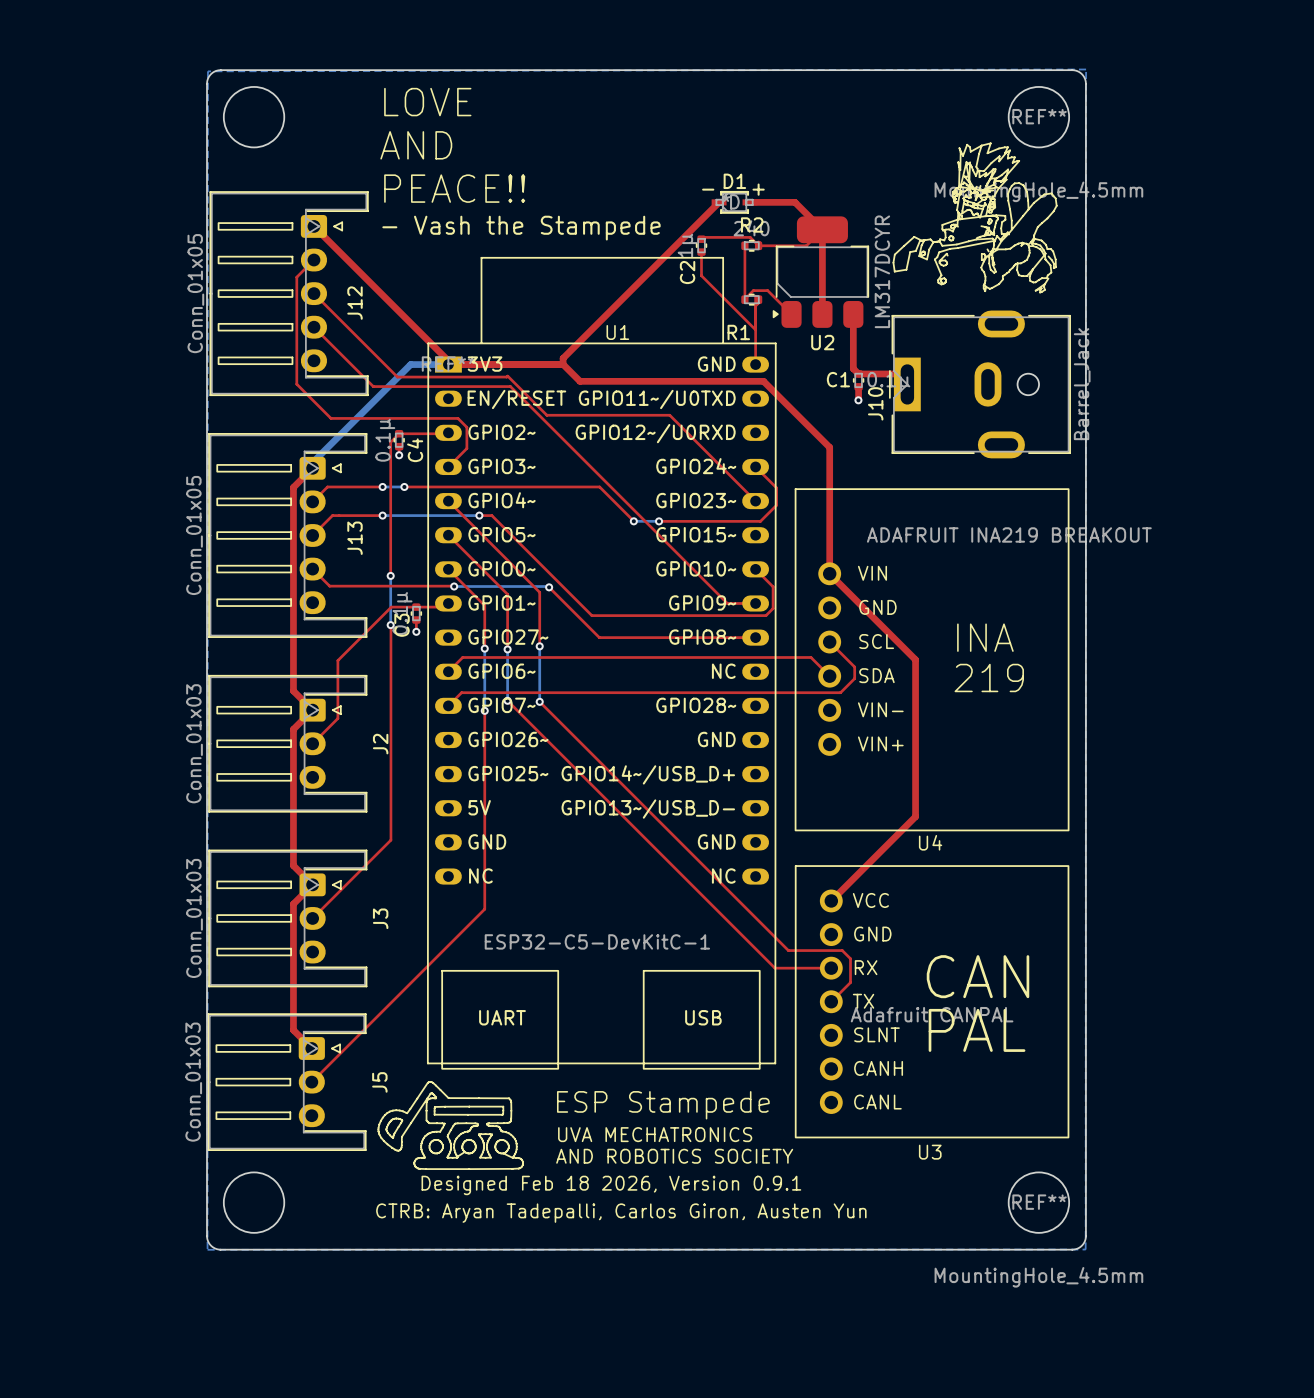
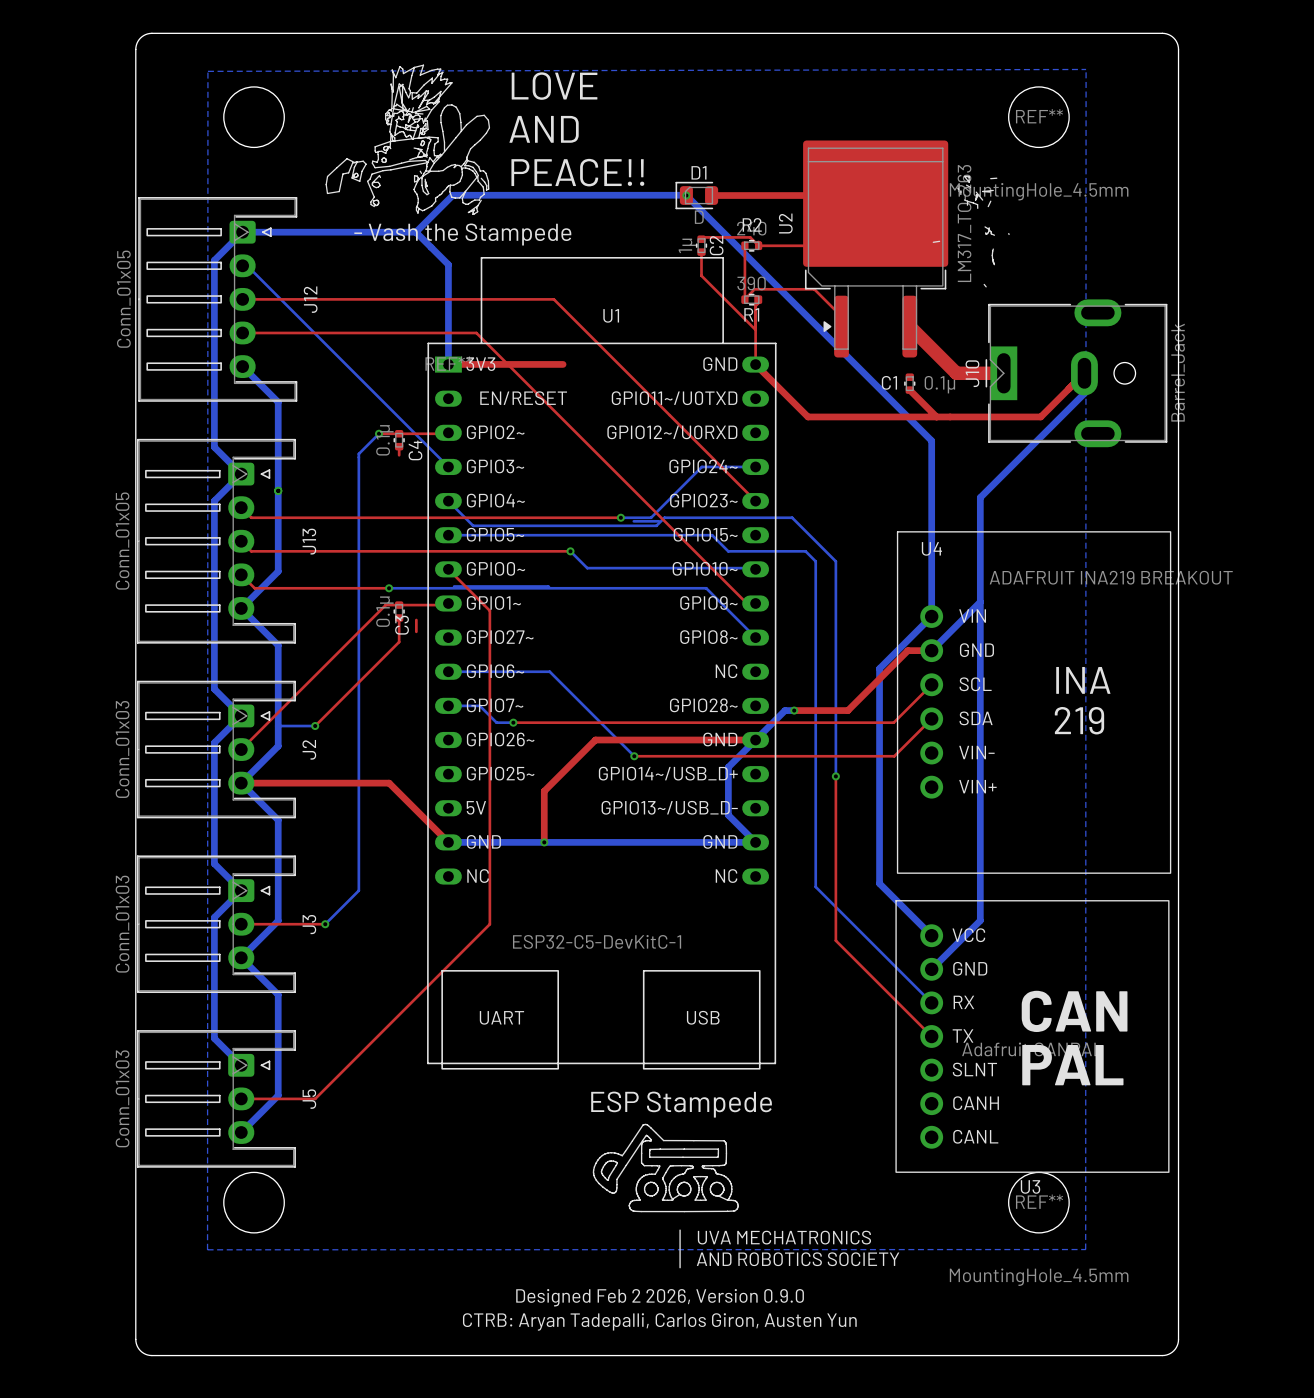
line: none -> (414, 67) (423, 65) (420, 75) (440, 69) (437, 75) (442, 72) (440, 80) (447, 79) (445, 84) (452, 82) (433, 103)
line: none -> (414, 67) (403, 73) (399, 66) (395, 77) (392, 70) (393, 92) (391, 84) (390, 110)
line: none -> (414, 67) (408, 97) (403, 87) (399, 84) (393, 108) (412, 111) (413, 107)
board edge: (220, 70) (1072, 70) (1083, 75) (1085, 83) (1085, 1236) (1080, 1246) (1072, 1249) (220, 1249) (209, 1244) (207, 1236) (207, 83) (211, 74) (220, 70) -> (151, 33) (140, 38) (135, 49) (135, 1339) (139, 1349) (145, 1354) (151, 1355) (1162, 1355) (1172, 1352) (1176, 1347) (1178, 1339) (1178, 49) (1175, 39) (1168, 34) (1162, 33) (151, 33)
line: none -> (439, 74) (431, 83) (432, 78) (416, 93) (412, 92) (412, 99) (419, 94) (418, 98) (426, 91)
line: none -> (426, 91) (423, 98) (418, 107) (428, 93) (428, 90) (426, 91)
line: none -> (429, 100) (426, 104) (433, 103)
line: none -> (429, 100) (423, 100)
line: none -> (429, 100) (440, 91) (438, 100) (433, 103)
text position: LOVE (427, 102) -> LOVE (554, 86)
line: none -> (433, 103) (439, 101) (425, 120) (427, 121) (427, 129) (423, 134) (421, 133) (424, 128) (422, 128) (422, 128) (422, 127) (424, 126) (424, 125) (425, 123) (426, 128) (425, 128) (420, 128) (418, 138)
line: none -> (409, 108) (407, 111)
line: none -> (390, 110) (385, 114) (386, 123) (390, 124)
line: none -> (390, 110) (391, 111)
line: none -> (407, 111) (405, 115) (420, 116) (418, 120) (415, 121)
line: none -> (407, 111) (402, 102) (402, 84) (399, 87) (403, 109) (406, 111) (396, 104) (393, 106) (389, 131) (392, 141)
line: none -> (411, 112) (429, 109) (426, 106) (415, 111) (415, 113) (422, 113)
line: none -> (409, 114) (415, 121)
line: none -> (398, 116) (396, 120) (394, 135) (403, 131) (406, 136) (410, 135) (412, 139) (417, 124) (418, 126) (418, 127) (416, 127) (410, 126)
line: none -> (409, 116) (408, 122) (410, 118) (409, 116)
line: none -> (398, 117) (403, 119) (401, 111) (394, 113) (393, 116) (387, 115) (388, 112) (389, 112) (390, 116) (387, 123) (390, 124)
line: none -> (425, 118) (423, 123) (422, 118) (413, 119)
line: none -> (415, 121) (405, 128) (405, 124) (410, 126)
line: none -> (396, 125) (410, 130)
line: none -> (410, 126) (410, 130)
line: none -> (410, 130) (415, 130)
line: none -> (461, 131) (459, 113) (456, 107) (447, 105) (440, 115) (444, 151)
line: none -> (425, 137) (430, 139) (426, 152)
line: none -> (394, 140) (391, 134) (390, 147)
line: none -> (422, 140) (421, 141) (421, 145) (424, 143) (422, 140)
text position: AND (416, 145) -> AND (544, 129)
line: (981, 145) (990, 143) (987, 153) (1007, 147) (1004, 153) (1010, 150) (1007, 158) (1014, 157) (1012, 162) (1019, 160) (1000, 181) -> none
line: (981, 145) (970, 151) (967, 144) (963, 155) (959, 148) (959, 186) (952, 192) (954, 201) (957, 202) -> none
line: (981, 145) (975, 175) (970, 165) (966, 162) (960, 186) (979, 190) (980, 185) -> none
line: none -> (387, 146) (384, 147) (383, 149) (386, 150) (389, 147) (390, 148)
line: none -> (387, 146) (385, 153) (381, 151) (377, 152)
line: none -> (414, 148) (421, 149) (417, 157) (426, 153) (427, 155) (409, 159)
line: none -> (417, 148) (427, 157)
line: none -> (377, 152) (377, 162) (372, 161) (372, 163) (375, 167) (409, 161) (425, 160) (427, 162) (371, 174) (367, 181) (374, 197) (371, 204) (374, 206)
line: none -> (377, 152) (375, 150) (375, 146) (390, 141) (429, 137) (438, 137) (438, 141) (434, 143) (434, 155) (441, 154)
line: (1006, 152) (999, 161) (999, 156) (984, 171) (979, 170) (979, 177) (986, 173) (985, 176) (993, 169) -> none
line: none -> (441, 155) (429, 171) (426, 170)
line: none -> (441, 155) (466, 124) (476, 116) (484, 115) (488, 120) (489, 127) (470, 148) (466, 159)
line: none -> (441, 155) (437, 155) (433, 161) (429, 157) (426, 170)
line: none -> (347, 158) (354, 162) (363, 161) (366, 164) (359, 181) (352, 178) (354, 167) (357, 161) (352, 163) (348, 172) (342, 174) (339, 191) (327, 193) (327, 176) (347, 158)
line: none -> (383, 158) (382, 161) (385, 161) (385, 158) (383, 158)
line: none -> (466, 159) (460, 166) (456, 165) (454, 167) (455, 164) (443, 170) (430, 171) (419, 178) (414, 189) (418, 198) (416, 207) (417, 213) (418, 208)
line: none -> (467, 160) (464, 165) (473, 167) (478, 175) (465, 191)
line: none -> (467, 160) (474, 162) (480, 171) (485, 173) (488, 189) (486, 190) (486, 185) (481, 178)
line: (993, 169) (991, 176) (986, 186) (995, 171) (995, 169) (993, 169) -> none
line: none -> (426, 170) (421, 178) (421, 185) (423, 191) (427, 194) (428, 193) (425, 186) (425, 179)
line: none -> (420, 171) (421, 173)
line: none -> (357, 175) (355, 173) (353, 176) (357, 176)
line: none -> (414, 175) (414, 181) (417, 181) (418, 177) (414, 175)
line: none -> (380, 177) (379, 175) (372, 183)
line: none -> (425, 181) (426, 184) (427, 186) (425, 181)
line: (1000, 181) (1006, 178) (1008, 169) (993, 182) (1000, 181) -> none
line: (1000, 181) (1006, 179) (992, 199) (994, 199) (995, 207) (991, 212) (988, 211) (991, 207) (989, 206) (989, 206) (990, 206) (991, 204) (992, 203) (993, 201) (993, 206) (992, 206) (988, 206) (985, 216) -> none
line: none -> (374, 182) (372, 184) (374, 186) (379, 185) (378, 182) (374, 182)
line: none -> (450, 185) (459, 181) (462, 174) (461, 168) (469, 169) (477, 177) (478, 181) (483, 187) (484, 194) (479, 200) (466, 204) (462, 202) (462, 198) (465, 191)
line: none -> (450, 185) (451, 197) (459, 197) (465, 191)
line: none -> (450, 185) (435, 198) (435, 201) (431, 205) (422, 210) (418, 208)
line: (976, 186) (974, 189) -> none
text position: PEACE!! (454, 188) -> PEACE!! (577, 172)
text: - (708, 189) -> none
line: (974, 189) (969, 180) (970, 162) (966, 165) (970, 187) (974, 189) (963, 182) (961, 184) (957, 209) (959, 219) -> none
line: (974, 189) (973, 193) (987, 194) (984, 199) (982, 200) (972, 206) (973, 202) (977, 204) (981, 205) (984, 205) (985, 205) (985, 204) (984, 203) (980, 217) (977, 213) (973, 214) (970, 209) (962, 213) (963, 198) (966, 194) -> none
D1 footprint: [711, 190, 758, 214] -> [675, 181, 719, 210]
line: (979, 190) (997, 187) (993, 184) (982, 190) (982, 191) -> none
via: none -> (686, 195)
top track: none -> (711, 195) (873, 195)
line: (966, 196) (970, 197) (969, 189) (961, 191) (960, 194) (954, 193) (955, 191) (956, 191) (957, 194) (954, 201) (958, 202) -> none
line: (992, 196) (990, 201) (989, 196) (980, 197) -> none
line: none -> (481, 200) (477, 205)
top track: (719, 202) (563, 358) (563, 364) (580, 381) (763, 381) (829, 447) (829, 573) (915, 659) (915, 816) (831, 900) -> none
top track: (750, 202) (795, 202) (822, 229) (822, 314) -> none
line: none -> (378, 203) (377, 200) (374, 200) (374, 205) (377, 204)
line: (963, 203) (982, 208) -> none
line: none -> (477, 205) (468, 212) (474, 210) (472, 214) (477, 211) (477, 205)
line: none -> (416, 206) (418, 208)
line: (1028, 209) (1027, 191) (1023, 185) (1014, 183) (1008, 193) (1011, 229) -> none
line: (992, 215) (998, 217) (993, 230) -> none
U2 footprint: [772, 216, 870, 328] -> [803, 140, 949, 358]
line: (962, 219) (958, 212) (957, 225) -> none
line: (990, 219) (988, 219) (988, 223) (991, 221) (990, 219) -> none
line: (955, 224) (951, 225) (950, 227) (954, 228) (956, 225) (958, 226) -> none
line: (955, 224) (953, 231) (949, 229) (945, 230) -> none
top track: (313, 226) (448, 360) (448, 364) (560, 364) -> none
line: (981, 226) (989, 227) (984, 235) (994, 232) (994, 233) (977, 237) -> none
text position: - Vash the Stampede (521, 228) -> - Vash the Stampede (462, 234)
line: (945, 230) (944, 240) (940, 239) (939, 241) (942, 245) (976, 239) (992, 238) (995, 240) (939, 252) (934, 259) (941, 275) (938, 282) (941, 284) -> none
line: (945, 230) (942, 229) (942, 224) (957, 219) (996, 215) (1005, 215) (1005, 219) (1002, 222) (1001, 233) (1008, 232) -> none
bottom track: none -> (415, 232) (452, 195) (686, 195) (931, 440) (931, 616) (879, 668) (879, 883) (931, 935)
bottom track: none -> (415, 232) (242, 232) (214, 260) (214, 447) (241, 474) (214, 500) (214, 689) (241, 715) (214, 742) (214, 863) (241, 890) (214, 917) (214, 1038) (241, 1065)
line: (1008, 233) (996, 249) (993, 249) -> none
line: (1008, 233) (1033, 202) (1044, 194) (1051, 193) (1055, 198) (1056, 205) (1037, 227) (1033, 237) -> none
line: (1008, 233) (1005, 234) (1000, 239) (997, 235) (993, 249) -> none
line: (914, 236) (921, 240) (930, 239) (933, 242) (927, 259) (919, 256) (921, 245) (924, 240) (919, 241) (915, 250) (910, 252) (906, 269) (894, 271) (894, 254) (914, 236) -> none
line: (950, 236) (949, 239) (953, 239) (952, 236) (950, 236) -> none
line: (1033, 237) (1028, 244) (1024, 243) (1021, 245) (1022, 242) (1010, 248) (997, 249) (986, 256) (981, 267) (985, 276) (983, 285) (985, 291) (986, 286) (989, 288) (999, 284) (1002, 279) (1002, 276) (1017, 263) -> none
line: (1034, 238) (1032, 243) (1040, 245) (1045, 253) (1032, 269) -> none
line: (1034, 238) (1041, 240) (1047, 249) (1053, 251) (1055, 267) (1053, 268) (1054, 263) (1048, 256) -> none
line: (987, 249) (988, 251) -> none
line: (993, 249) (989, 256) (989, 263) (990, 269) (994, 272) (995, 271) (992, 264) (992, 257) -> none
line: (924, 253) (923, 251) (920, 254) (924, 254) -> none
line: (981, 253) (981, 259) (984, 259) (985, 255) (981, 253) -> none
line: (947, 255) (946, 253) (939, 261) -> none
top track: (313, 260) (296, 277) (296, 384) (331, 418) (458, 418) (466, 427) (466, 448) (448, 466) -> none
line: (945, 260) (940, 260) (939, 262) (945, 265) (947, 263) (945, 260) -> none
line: (1017, 263) (1027, 259) (1029, 252) (1028, 246) (1036, 247) (1044, 255) (1045, 259) (1050, 265) (1051, 272) (1046, 278) (1033, 282) (1030, 280) (1029, 276) (1032, 269) -> none
line: (1017, 263) (1018, 275) (1027, 276) (1032, 269) -> none
bottom track: none -> (242, 265) (247, 265) (448, 466)
U2 value: LM317DCYR (882, 271) -> LM317_TO-263 (964, 223)
C2 name position: C2 (687, 272) -> C2 (716, 245)
line: (1048, 278) (1045, 283) -> none
line: (945, 281) (944, 278) (941, 278) (942, 283) (944, 282) -> none
line: (945, 281) (945, 282) -> none
R1 value: none -> 390 (751, 283)
line: (1045, 283) (1035, 290) (1041, 288) (1040, 292) (1044, 289) (1045, 283) -> none
top track: none -> (754, 289) (814, 289) (841, 316)
top track: (753, 290) (767, 290) (791, 314) -> none
J12 position: (289, 293) -> (217, 299)
top track: (313, 293) (397, 377) (507, 376) (546, 415) (669, 415) -> (242, 299) (553, 299) (669, 415)
J12 name position: J12 (354, 303) -> J12 (310, 299)
top track: (853, 314) (853, 368) (858, 373) (896, 373) (907, 384) -> none
top track: none -> (909, 326) (956, 373) (1003, 373) (1003, 370)
top track: (313, 327) (373, 386) (510, 386) (727, 603) (755, 603) -> none
top track: none -> (242, 332) (476, 332) (746, 603)
U1 name position: U1 (617, 332) -> U1 (611, 315)
R1 name position: R1 (738, 332) -> R1 (751, 314)
U2 name position: U2 (822, 342) -> U2 (785, 223)
bottom track: (448, 364) (410, 364) (312, 462) (312, 468) -> (448, 364) (448, 264) (415, 232)
top track: none -> (755, 364) (808, 416) (1040, 416) (1084, 373)
bottom track: none -> (242, 366) (278, 402) (278, 571) (241, 608) (278, 645) (278, 746) (241, 783) (278, 820) (278, 920) (241, 957) (278, 994) (278, 1095) (241, 1132)
bottom track: none -> (1084, 373) (1084, 393) (980, 497) (980, 920) (931, 969)
C1 position: (858, 380) -> (909, 383)
J10 position: (979, 384) -> (1076, 373)
top track: (858, 386) (858, 400) -> none
top track: none -> (909, 390) (936, 416)
via: (858, 400) -> none
J10 name position: J10 (875, 403) -> J10 (972, 373)
bottom track: none -> (379, 433) (358, 453) (358, 890) (325, 924)
via: none -> (379, 433)
top track: (399, 433) (390, 442) (390, 575) -> (399, 433) (379, 433)
via: (399, 455) -> none
top track: (755, 466) (776, 487) (776, 505) (760, 521) (659, 521) -> none
bottom track: none -> (755, 466) (701, 466) (651, 517) (620, 517)
top track: (312, 468) (293, 487) (293, 691) (312, 710) (293, 729) (293, 865) (312, 884) (293, 904) (293, 1030) (311, 1048) -> none
top track: (382, 486) (327, 486) (312, 501) -> none
bottom track: (382, 486) (404, 486) -> none
via: (382, 486) -> none
top track: (404, 486) (599, 486) (633, 521) -> none
via: (404, 486) -> none
via: none -> (278, 490)
top track: (448, 501) (539, 592) (539, 646) -> none
bottom track: none -> (448, 501) (473, 525) (656, 525) (664, 517) (792, 517) (835, 561) (835, 776)
top track: none -> (241, 507) (251, 517) (620, 517)
top track: (382, 515) (332, 515) (312, 535) -> none
bottom track: (382, 515) (479, 515) -> none
via: (382, 515) -> none
top track: (479, 515) (491, 515) (591, 615) (766, 615) (773, 608) (773, 586) (755, 569) -> none
via: (479, 515) -> none
via position: (633, 521) -> (620, 517)
via: (659, 521) -> none
J13 position: (287, 535) -> (216, 541)
top track: (448, 535) (507, 594) (507, 649) -> none
bottom track: none -> (448, 535) (712, 535) (728, 551) (805, 551) (815, 561) (815, 886) (931, 1002)
J13 name position: J13 (354, 538) -> J13 (309, 541)
top track: none -> (241, 541) (251, 551) (570, 551)
bottom track: none -> (570, 551) (587, 568) (754, 568)
via: none -> (570, 551)
top track: (312, 569) (329, 586) (454, 586) -> none
top track: none -> (241, 574) (254, 588) (389, 588)
bottom track: (390, 575) (390, 625) -> none
via position: (390, 575) -> (389, 588)
via: (454, 586) -> none
top track: (549, 587) (599, 637) (755, 637) -> none
via: (549, 587) -> none
bottom track: none -> (389, 588) (706, 588) (755, 637)
bottom track: none -> (980, 602) (931, 650)
top track: (448, 603) (444, 607) (391, 607) (337, 660) (337, 718) (312, 743) -> none
top track: none -> (446, 605) (385, 605) (241, 749)
top track: (484, 605) (484, 648) -> (484, 605) (489, 610) (489, 924) (315, 1098) (241, 1098)
C3 position: (416, 613) -> (399, 611)
top track: none -> (399, 617) (399, 642) (315, 726)
top track: (390, 625) (390, 840) (312, 918) -> none
via: (390, 625) -> none
via: (416, 631) -> none
top track: (829, 642) (854, 667) (854, 678) (840, 692) (461, 692) (448, 705) -> none
bottom track: (539, 646) (539, 701) -> none
via: (539, 646) -> none
bottom track: (484, 648) (484, 710) -> none
via: (484, 648) -> none
bottom track: (507, 649) (507, 700) -> none
via: (507, 649) -> none
top track: none -> (931, 650) (907, 650) (847, 710) (794, 710)
U4 position: (932, 659) -> (1034, 702)
top track: (448, 671) (462, 657) (811, 657) (829, 676) -> none
bottom track: none -> (448, 671) (549, 671) (634, 756)
top track: none -> (931, 684) (893, 722) (513, 722)
top track: (507, 700) (774, 968) (831, 968) -> none
via: (507, 700) -> none
top track: (539, 701) (788, 950) (842, 950) (850, 958) (850, 982) (831, 1001) -> none
via: (539, 701) -> none
bottom track: none -> (448, 705) (479, 705) (496, 722) (513, 722)
top track: (484, 710) (484, 909) (311, 1082) -> none
via: (484, 710) -> none
bottom track: none -> (794, 710) (785, 710) (728, 767) (728, 815) (755, 842) (448, 842)
via: none -> (794, 710)
top track: none -> (931, 718) (894, 756) (634, 756)
via: none -> (513, 722)
bottom track: none -> (278, 726) (315, 726)
via: none -> (315, 726)
top track: none -> (755, 740) (595, 740) (544, 791) (544, 842)
J2 position: (287, 743) -> (216, 749)
via: none -> (634, 756)
top track: none -> (835, 776) (835, 940) (931, 1036)
via: none -> (835, 776)
top track: none -> (241, 783) (389, 783) (448, 842)
via: none -> (544, 842)
U4 name position: U4 (930, 842) -> U4 (931, 548)
J3 position: (287, 918) -> (216, 924)
top track: none -> (241, 924) (325, 924)
via: none -> (325, 924)
U3 position: (932, 1001) -> (1032, 1036)
J5 position: (286, 1082) -> (216, 1098)
line: (469, 1106) (503, 1106) (503, 1114) (434, 1114) (434, 1106) (469, 1106) -> none
line: (396, 1118) (391, 1120) (386, 1129) (392, 1137) (402, 1120) (396, 1118) -> (611, 1160) (606, 1163) (601, 1171) (608, 1180) (617, 1163) (611, 1160)
line: (485, 1134) (479, 1134) (484, 1145) (480, 1157) (490, 1157) (486, 1145) (492, 1134) (485, 1134) -> (700, 1176) (694, 1176) (699, 1187) (695, 1200) (706, 1200) (701, 1187) (707, 1176) (700, 1176)
text position: UVA MECHATRONICS (655, 1134) -> UVA MECHATRONICS (784, 1237)
line: (435, 1139) (430, 1142) (429, 1147) (433, 1152) (437, 1153) (443, 1146) (440, 1141) (435, 1139) -> (650, 1182) (646, 1184) (644, 1190) (648, 1195) (652, 1195) (658, 1189) (656, 1184) (650, 1182)
line: none -> (660, 1149) (649, 1149) (649, 1157) (718, 1156) (718, 1149) (660, 1149)
line: (464, 1152) (462, 1147) (463, 1142) (468, 1139) (472, 1140) (475, 1145) (474, 1150) (470, 1153) (464, 1152) -> (679, 1194) (677, 1190) (678, 1185) (683, 1182) (687, 1183) (690, 1187) (689, 1192) (685, 1195) (679, 1194)
line: (464, 1152) (457, 1156) -> (679, 1194) (672, 1199)
line: (503, 1153) (507, 1149) (508, 1145) (505, 1140) (500, 1140) (495, 1143) (495, 1148) (498, 1152) (503, 1153) -> (718, 1195) (722, 1192) (723, 1187) (720, 1183) (715, 1182) (711, 1186) (710, 1191) (713, 1194) (718, 1195)
line: (503, 1153) (512, 1157) -> (718, 1195) (727, 1200)
line: (457, 1156) (454, 1147) (456, 1138) (477, 1123) (457, 1123) (453, 1125) (447, 1136) (451, 1147) (447, 1157) (457, 1156) -> (672, 1199) (669, 1190) (671, 1181) (692, 1166) (672, 1165) (668, 1168) (662, 1178) (666, 1190) (662, 1199) (672, 1199)
text position: AND ROBOTICS SOCIETY (674, 1156) -> AND ROBOTICS SOCIETY (798, 1259)
line: (512, 1157) (516, 1149) (514, 1138) (508, 1133) (501, 1130) (498, 1126) (487, 1123) (510, 1121) (511, 1102) (509, 1098) (448, 1098) (433, 1083) (428, 1082) (407, 1113) (399, 1110) (389, 1111) (382, 1117) (379, 1124) (378, 1131) (381, 1137) (392, 1147) (400, 1150) (401, 1136) (431, 1092) (436, 1097) (427, 1100) (426, 1120) (429, 1123) (444, 1123) (440, 1131) (430, 1132) (424, 1137) (421, 1147) (425, 1157) (415, 1159) (414, 1163) (415, 1167) (426, 1169) (469, 1169) (512, 1168) (521, 1166) (521, 1159) (512, 1157) -> (727, 1200) (731, 1191) (729, 1181) (723, 1175) (716, 1173) (713, 1169) (702, 1166) (725, 1163) (726, 1144) (724, 1140) (663, 1140) (648, 1125) (643, 1124) (622, 1155) (614, 1152) (604, 1153) (597, 1160) (594, 1166) (593, 1173) (596, 1180) (607, 1190) (615, 1192) (616, 1179) (646, 1135) (651, 1140) (642, 1143) (641, 1162) (644, 1165) (659, 1166) (655, 1174) (645, 1175) (639, 1180) (636, 1189) (640, 1200) (630, 1201) (629, 1205) (630, 1209) (641, 1211) (684, 1211) (727, 1211) (736, 1209) (737, 1202) (727, 1200)
text: Designed Feb 18 2026, Version 0.9.1 (611, 1185) -> none
text position: CTRB: Aryan Tadepalli, Carlos Giron, Austen Yun (621, 1213) -> CTRB: Aryan Tadepalli, Carlos Giron, Austen Yun (659, 1321)
line: none -> (680, 1230) (680, 1267)
text: none -> Designed Feb 2 2026, Version 0.9.0 (660, 1297)

